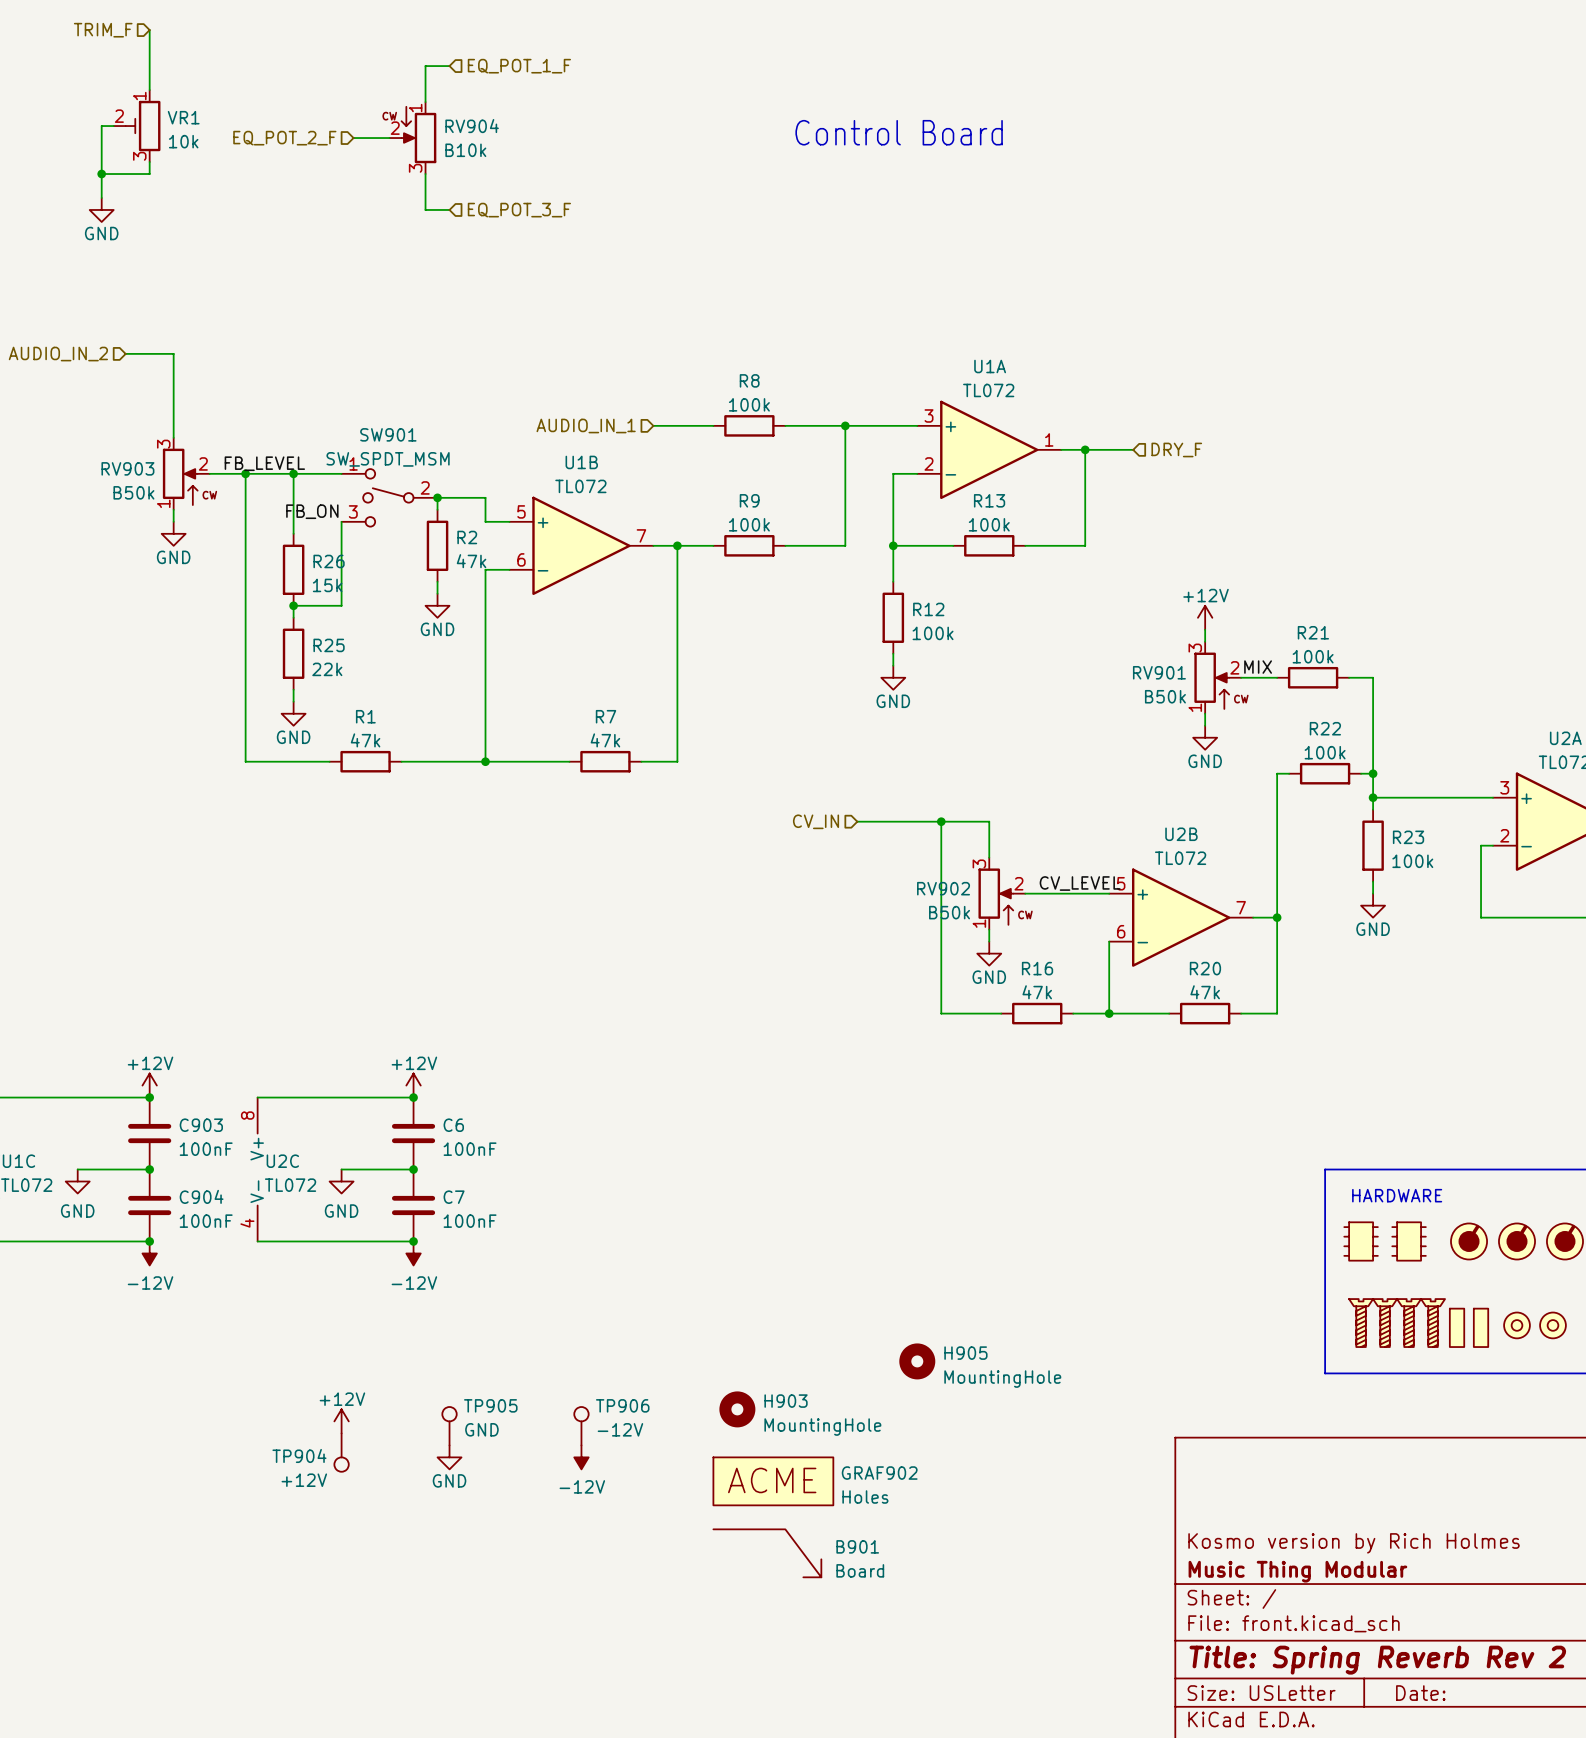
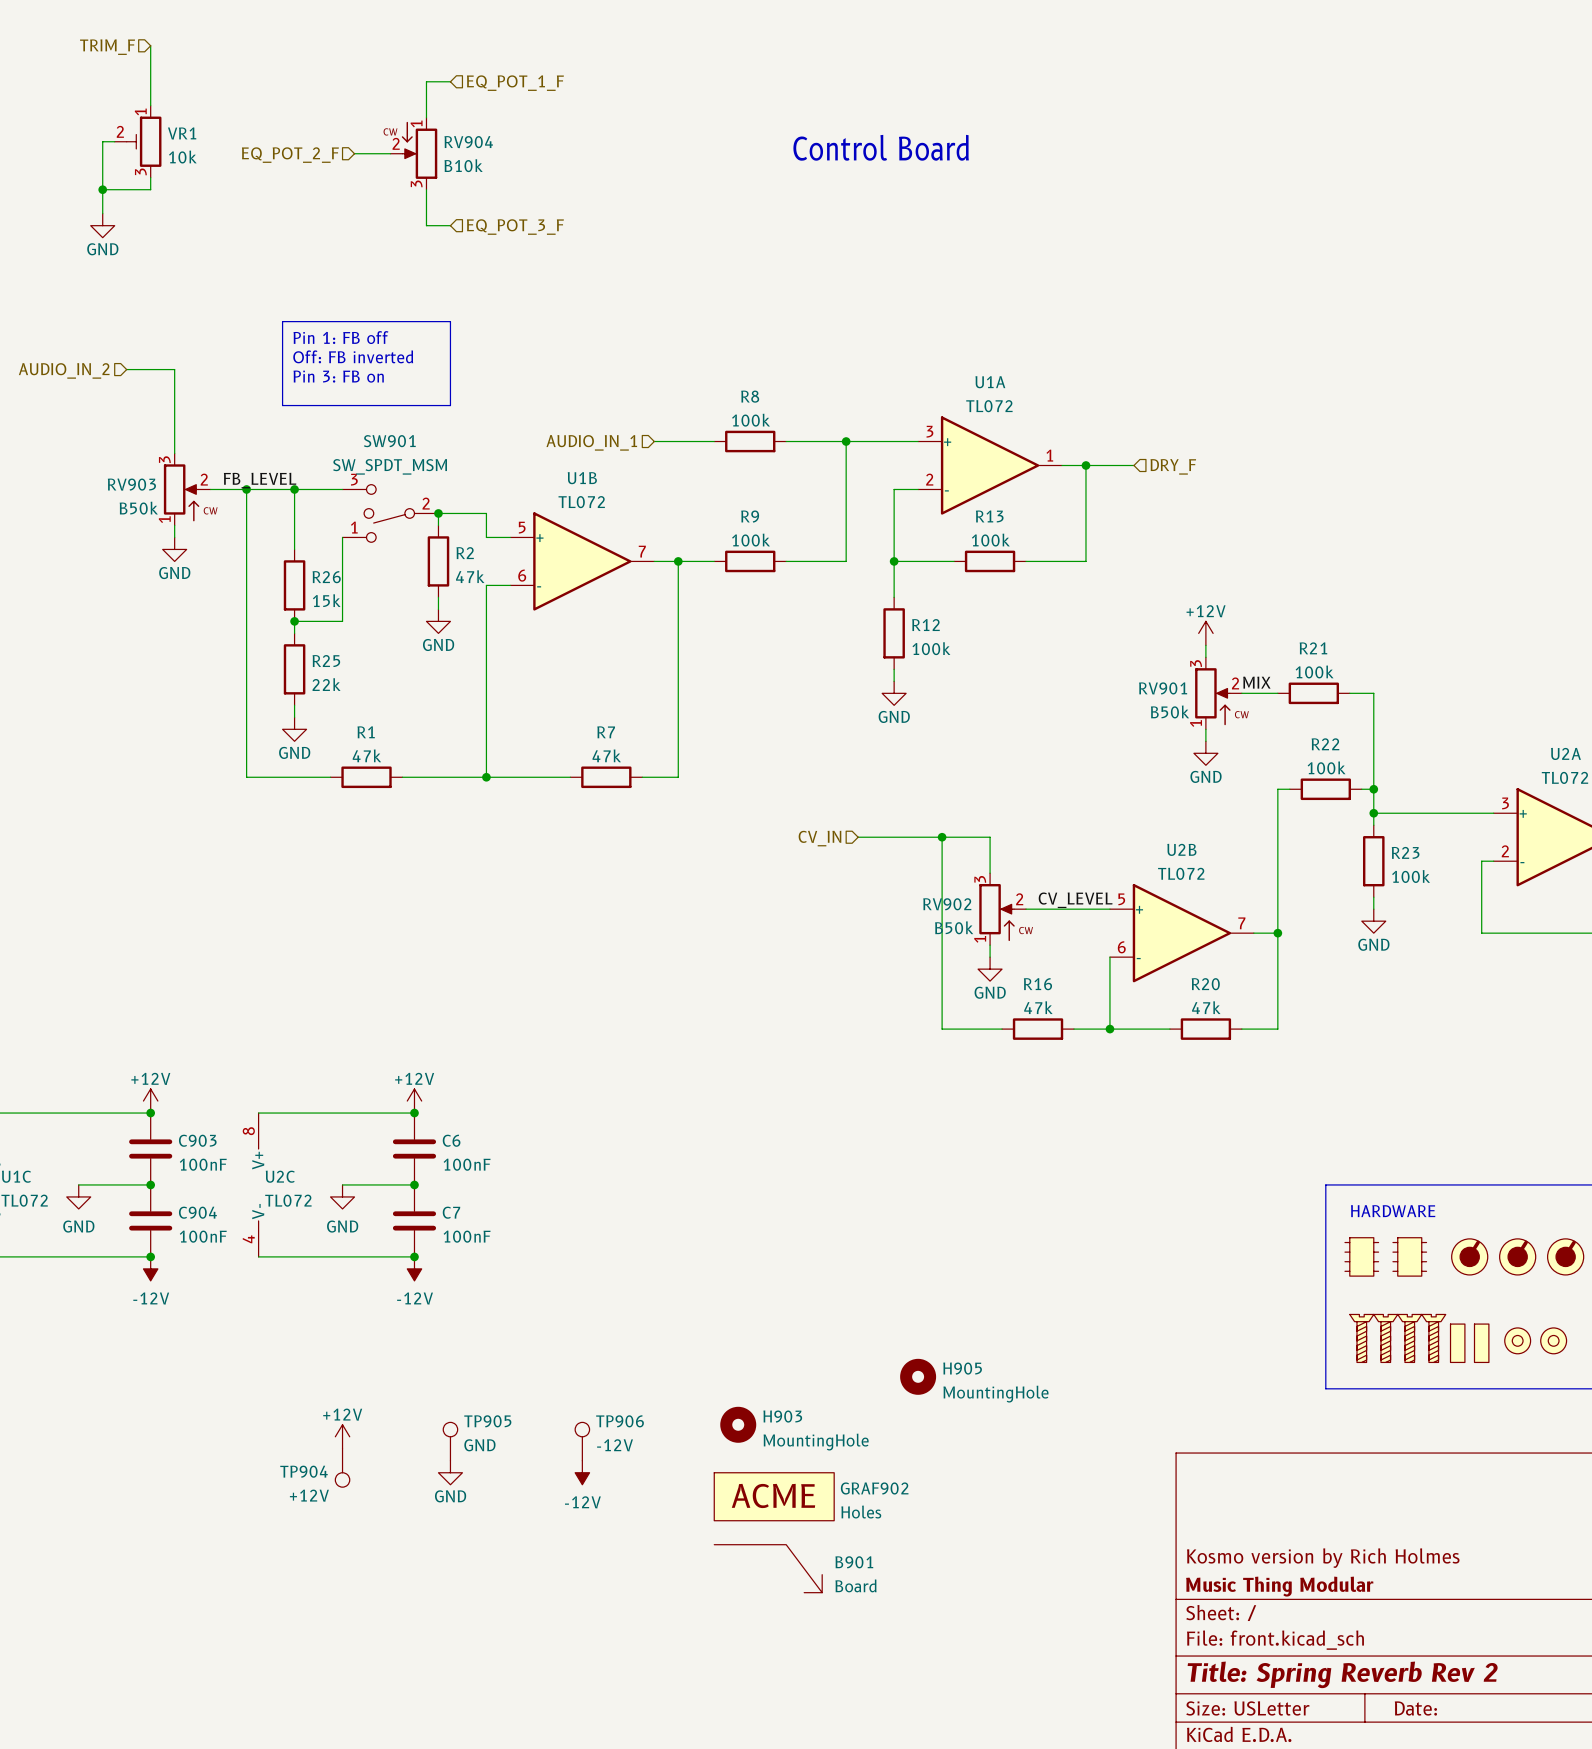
line: none -> (282, 321) (450, 321) (450, 405) (282, 405) (282, 321)
text: none -> Pin 1: FB off (340, 337)
text: none -> Off: FB inverted (353, 356)
text: none -> Pin 3: FB on (338, 376)
SW901 flip: as is (388, 497) -> up-down (389, 513)
label: FB_ON (312, 511) -> none

